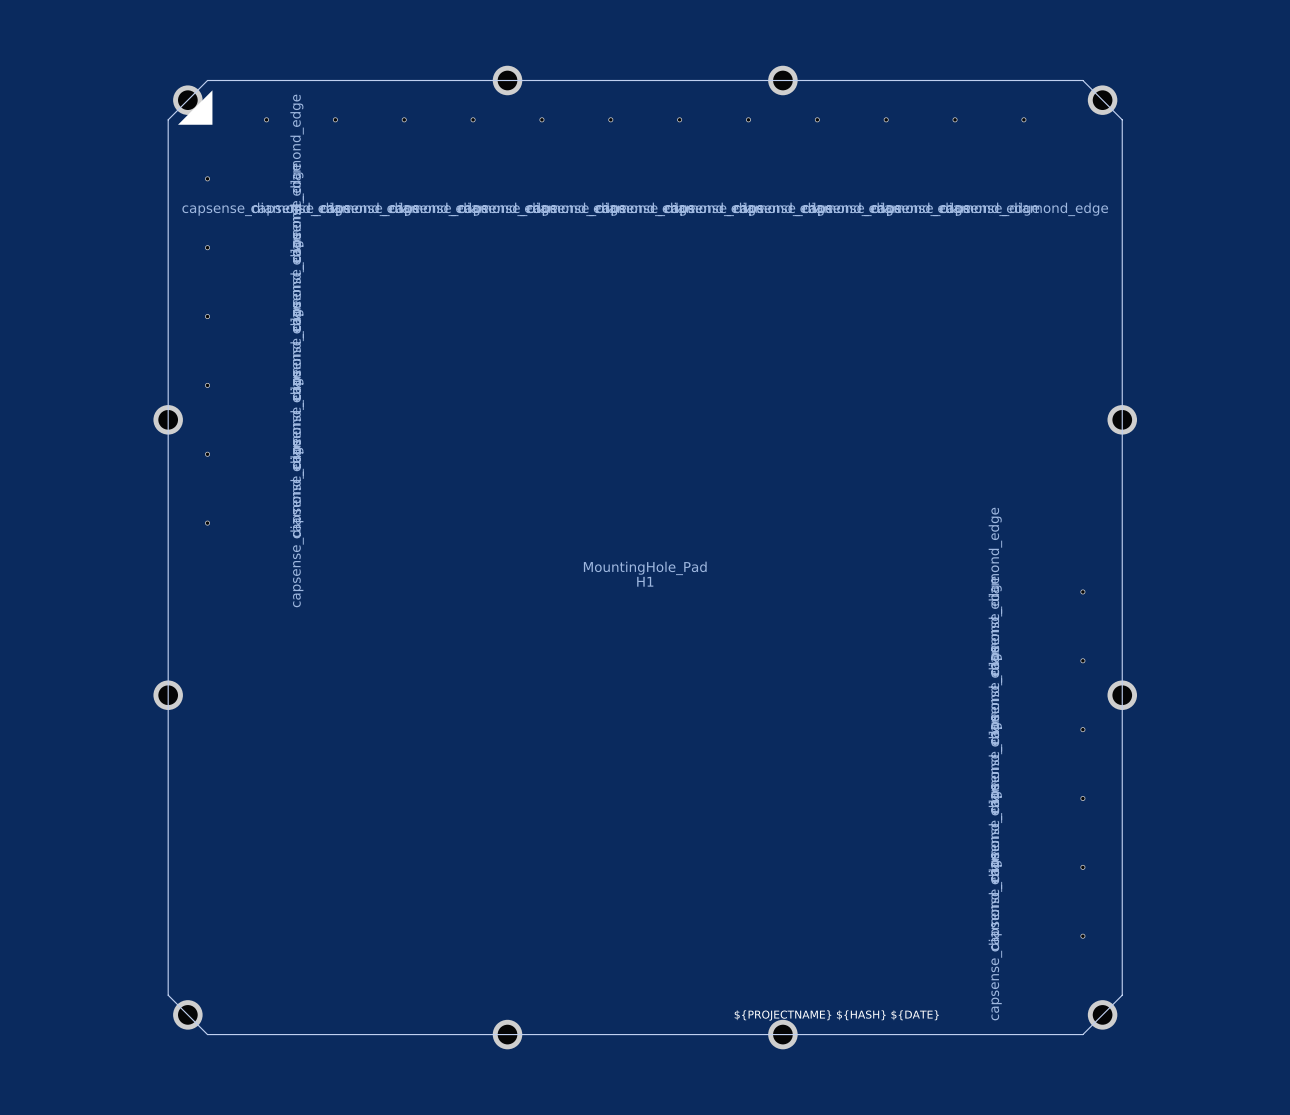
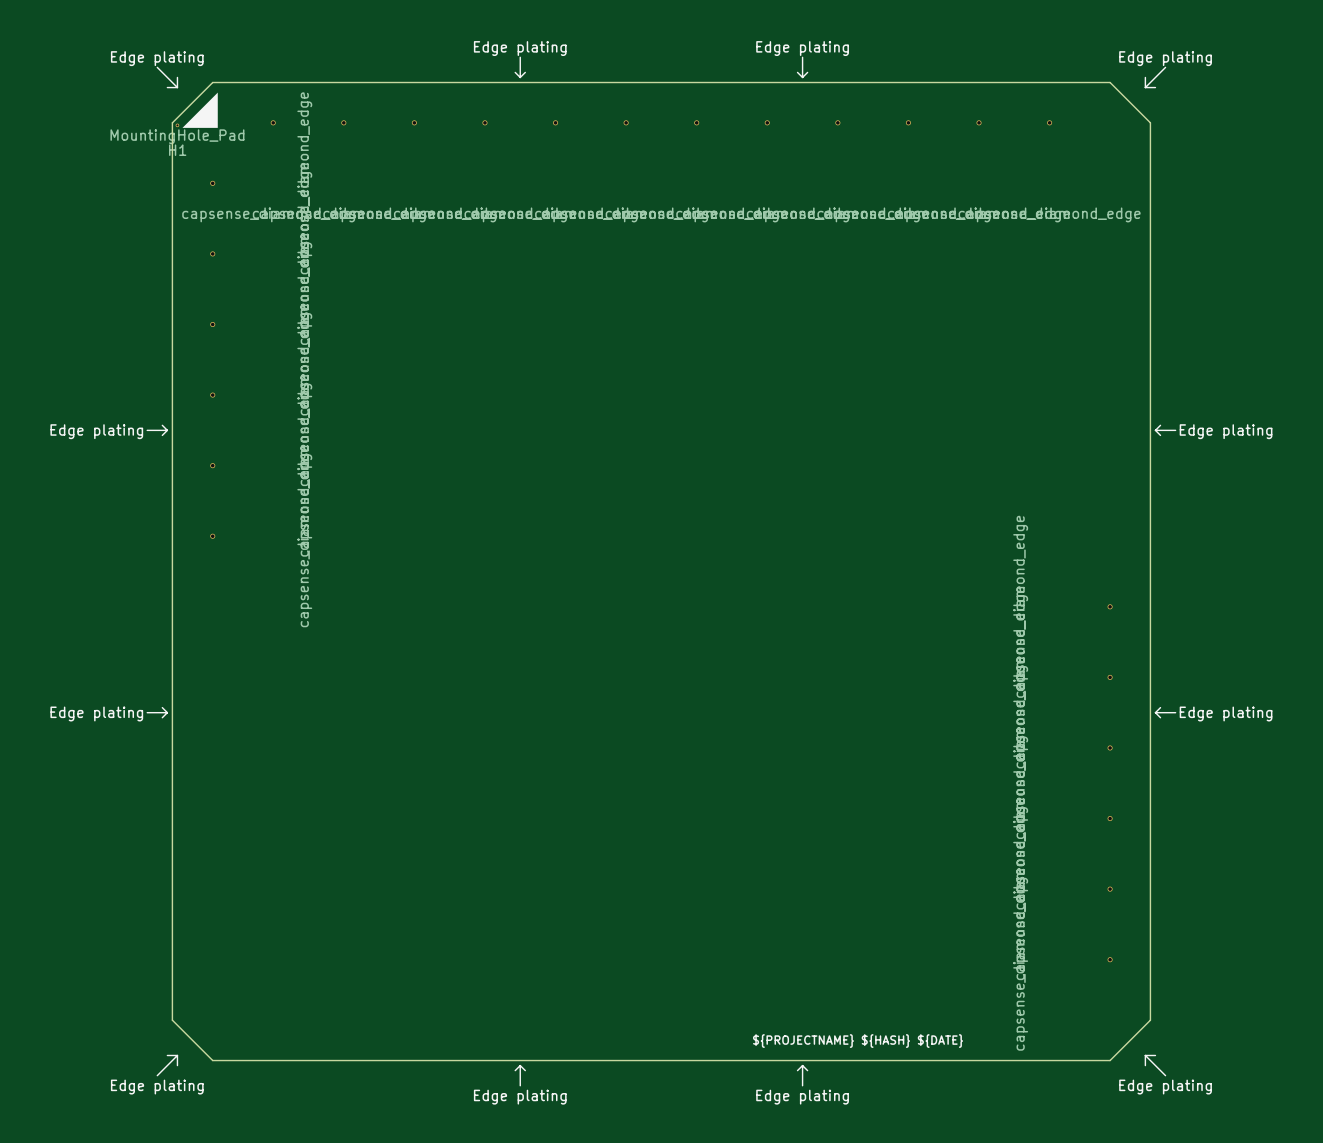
text: none -> Edge plating (520, 48)
text: none -> Edge plating (802, 48)
line: none -> (520, 57) (520, 77)
line: none -> (802, 57) (802, 77)
text: none -> Edge plating (157, 58)
text: none -> Edge plating (1165, 58)
line: none -> (157, 67) (177, 87)
H1 footprint: [153, 65, 1138, 1050] -> [175, 123, 180, 128]
line: none -> (1165, 67) (1145, 87)
line: none -> (515, 72) (520, 77)
line: none -> (525, 72) (520, 77)
line: none -> (797, 72) (802, 77)
line: none -> (807, 72) (802, 77)
line: none -> (177, 77) (177, 87)
line: none -> (1145, 77) (1145, 87)
line: none -> (167, 87) (177, 87)
line: none -> (1145, 87) (1155, 87)
line: none -> (162, 425) (167, 430)
line: none -> (1160, 425) (1155, 430)
line: none -> (147, 430) (167, 430)
line: none -> (167, 430) (162, 435)
line: none -> (1155, 430) (1175, 430)
line: none -> (1155, 430) (1160, 435)
text: none -> Edge plating (96, 431)
text: none -> Edge plating (1226, 431)
line: none -> (162, 707) (167, 712)
line: none -> (1160, 707) (1155, 712)
line: none -> (147, 712) (167, 712)
line: none -> (167, 712) (162, 717)
line: none -> (1155, 712) (1175, 712)
line: none -> (1155, 712) (1160, 717)
text: none -> Edge plating (96, 713)
text: none -> Edge plating (1226, 713)
line: none -> (167, 1055) (177, 1055)
line: none -> (177, 1055) (157, 1075)
line: none -> (177, 1055) (177, 1065)
line: none -> (1145, 1055) (1165, 1075)
line: none -> (1145, 1055) (1155, 1055)
line: none -> (1145, 1055) (1145, 1065)
line: none -> (520, 1065) (525, 1070)
line: none -> (520, 1065) (520, 1085)
line: none -> (520, 1065) (515, 1070)
line: none -> (802, 1065) (807, 1070)
line: none -> (802, 1065) (802, 1085)
line: none -> (802, 1065) (797, 1070)
text: none -> Edge plating (157, 1087)
text: none -> Edge plating (1165, 1087)
text: none -> Edge plating (520, 1097)
text: none -> Edge plating (802, 1097)

